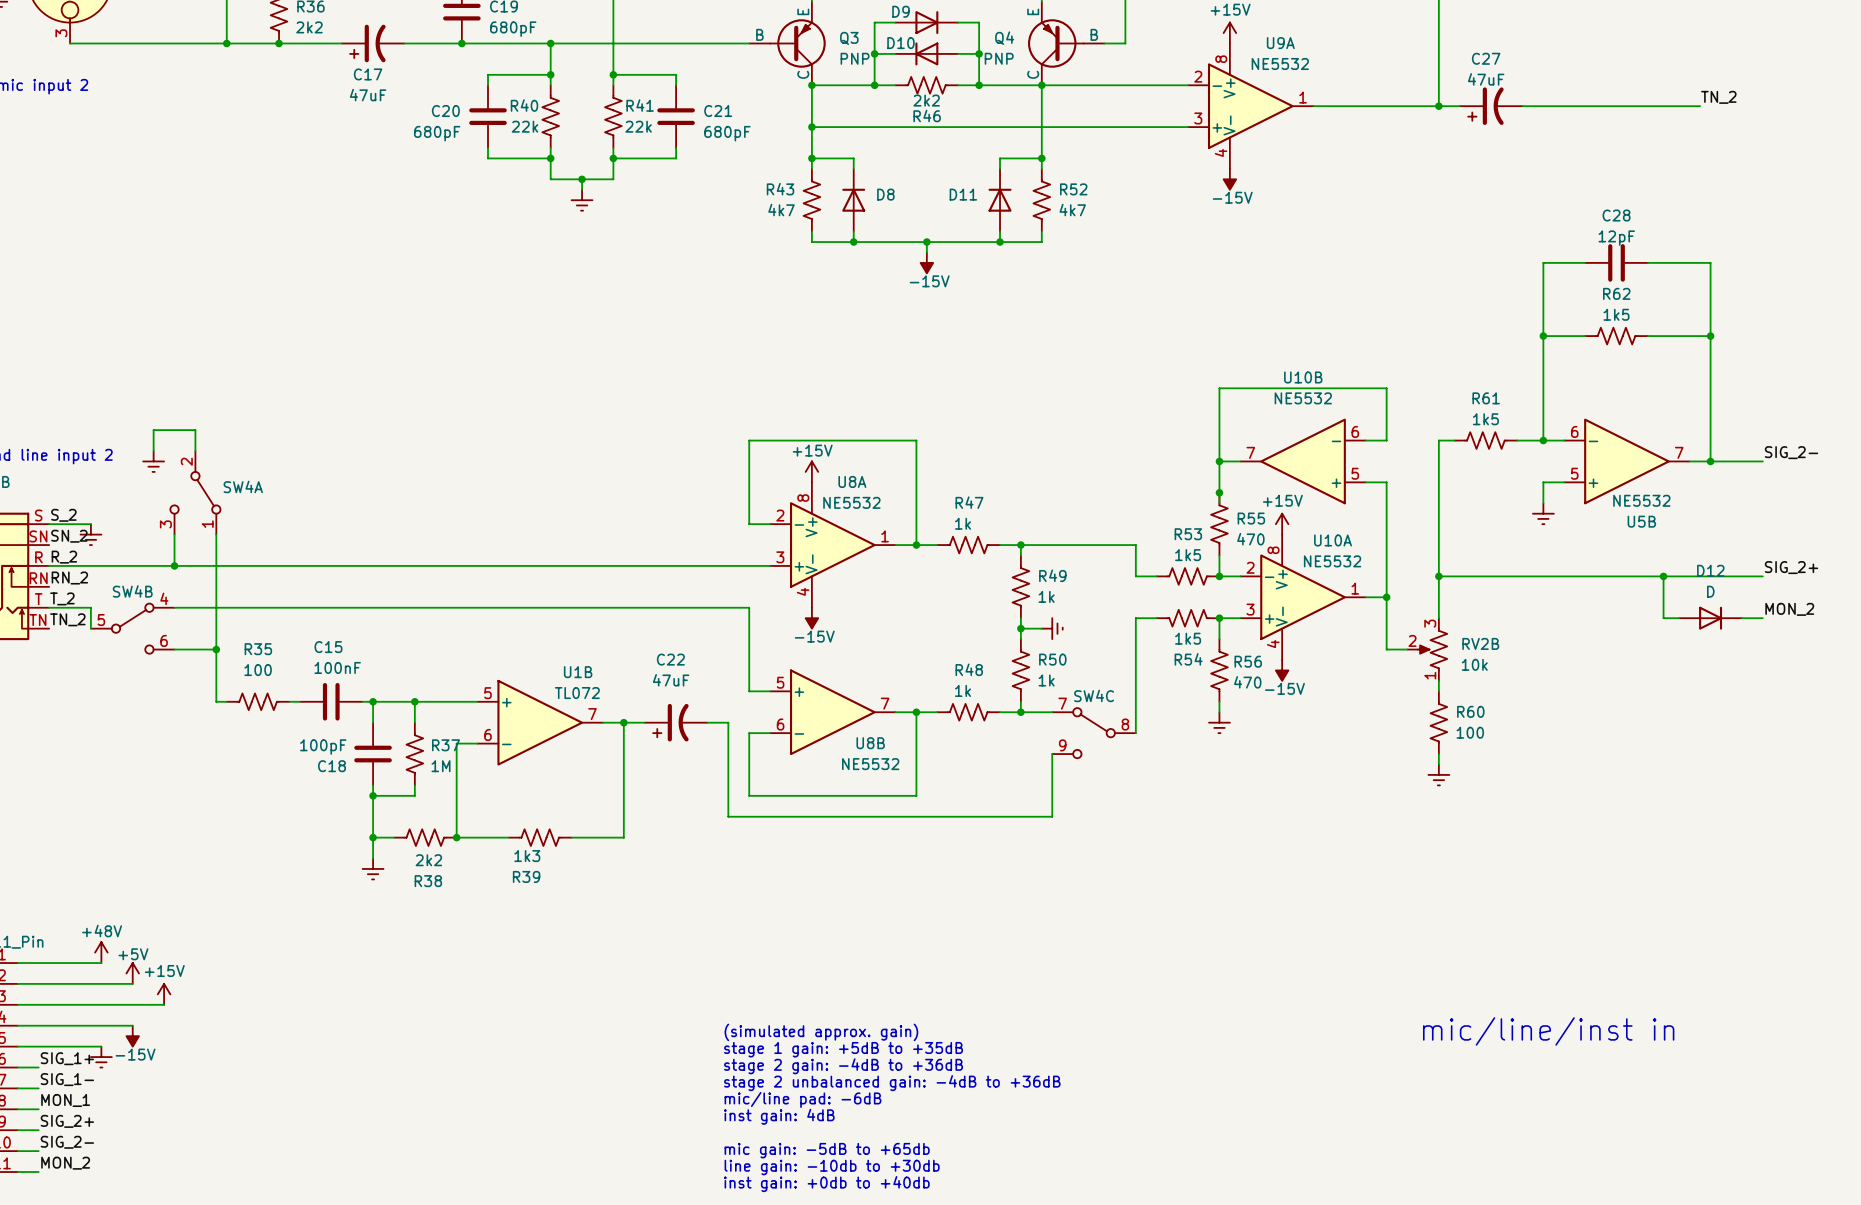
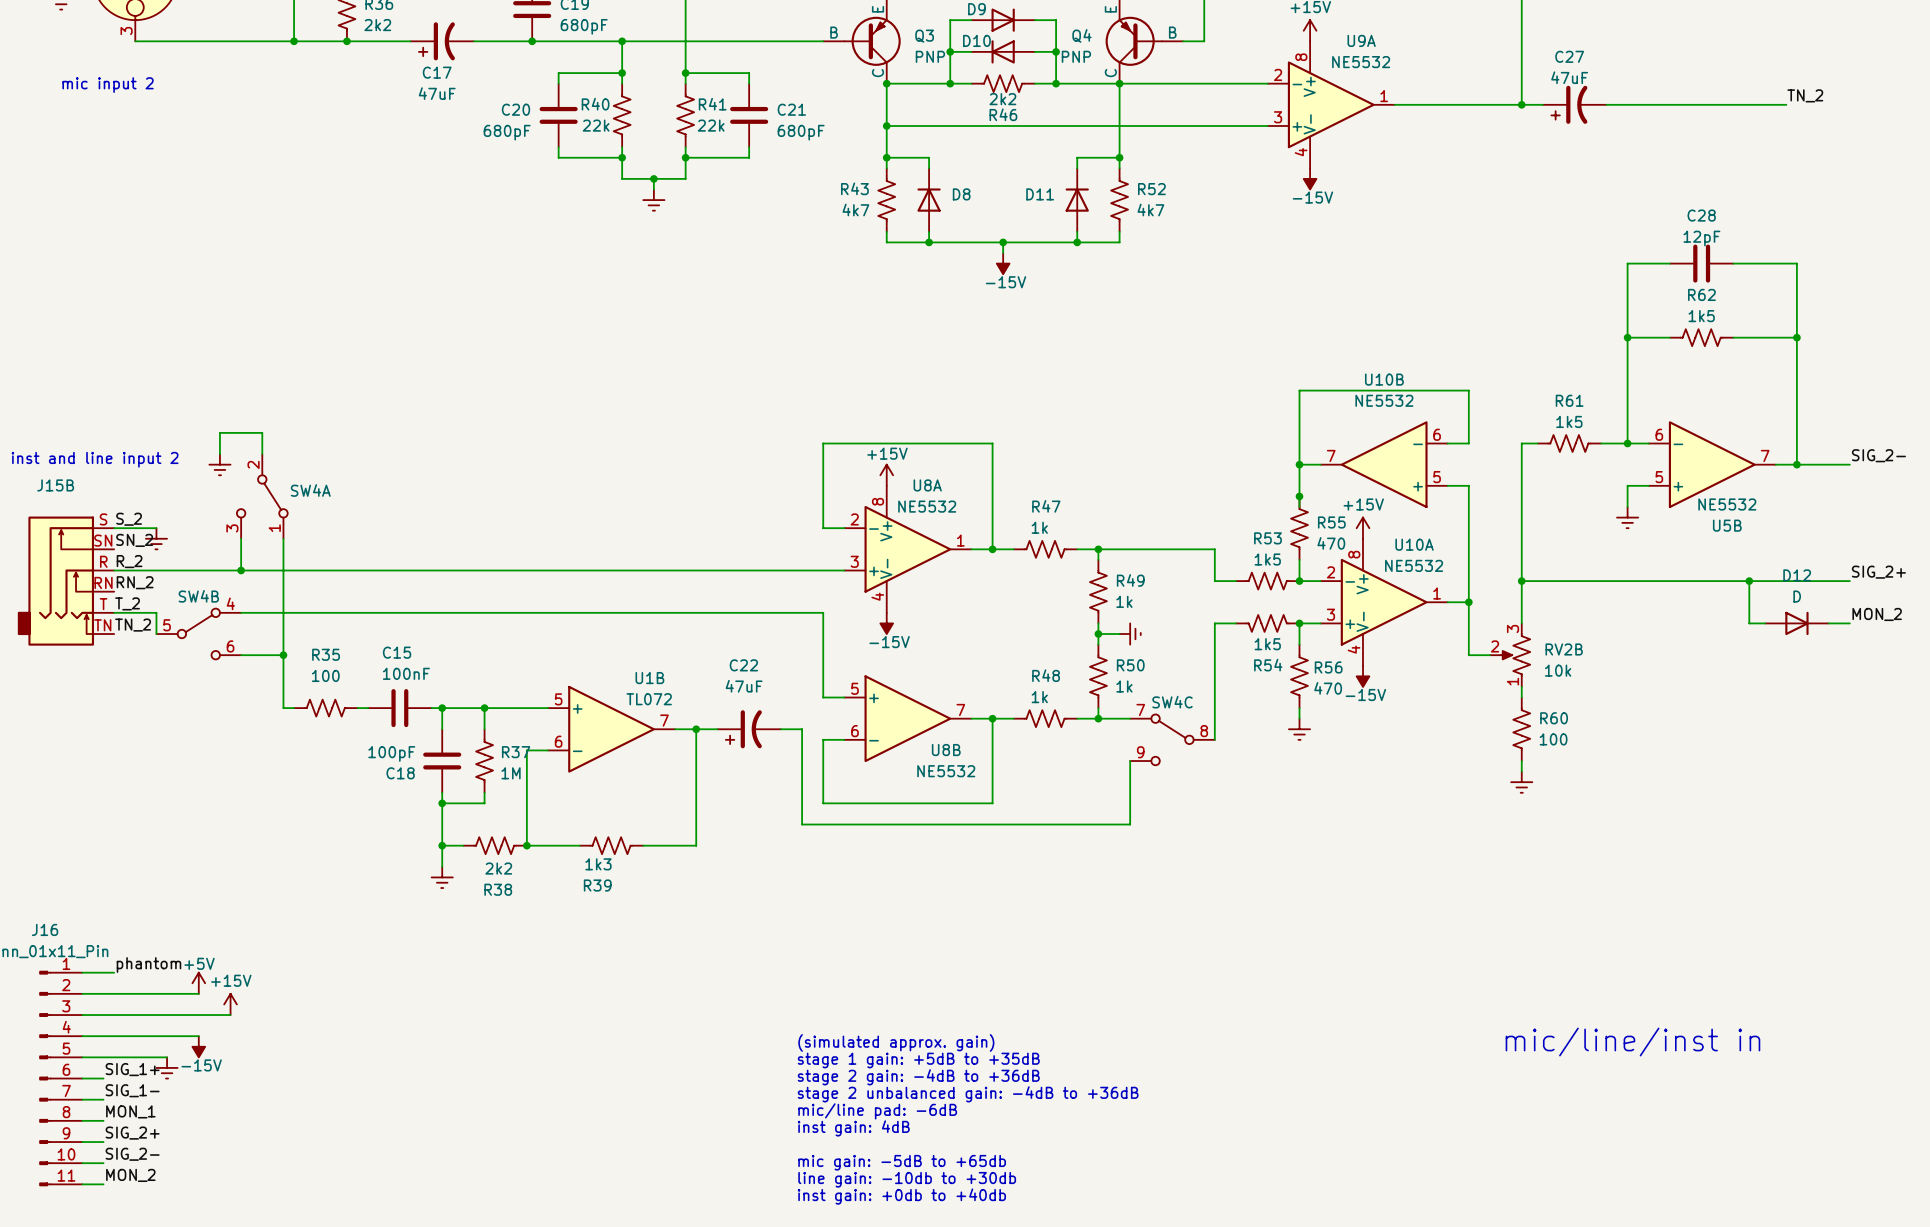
power symbol: +48V (101, 952) -> none
label: none -> phantom (148, 965)
wire: (49, 963) (101, 963) -> none

